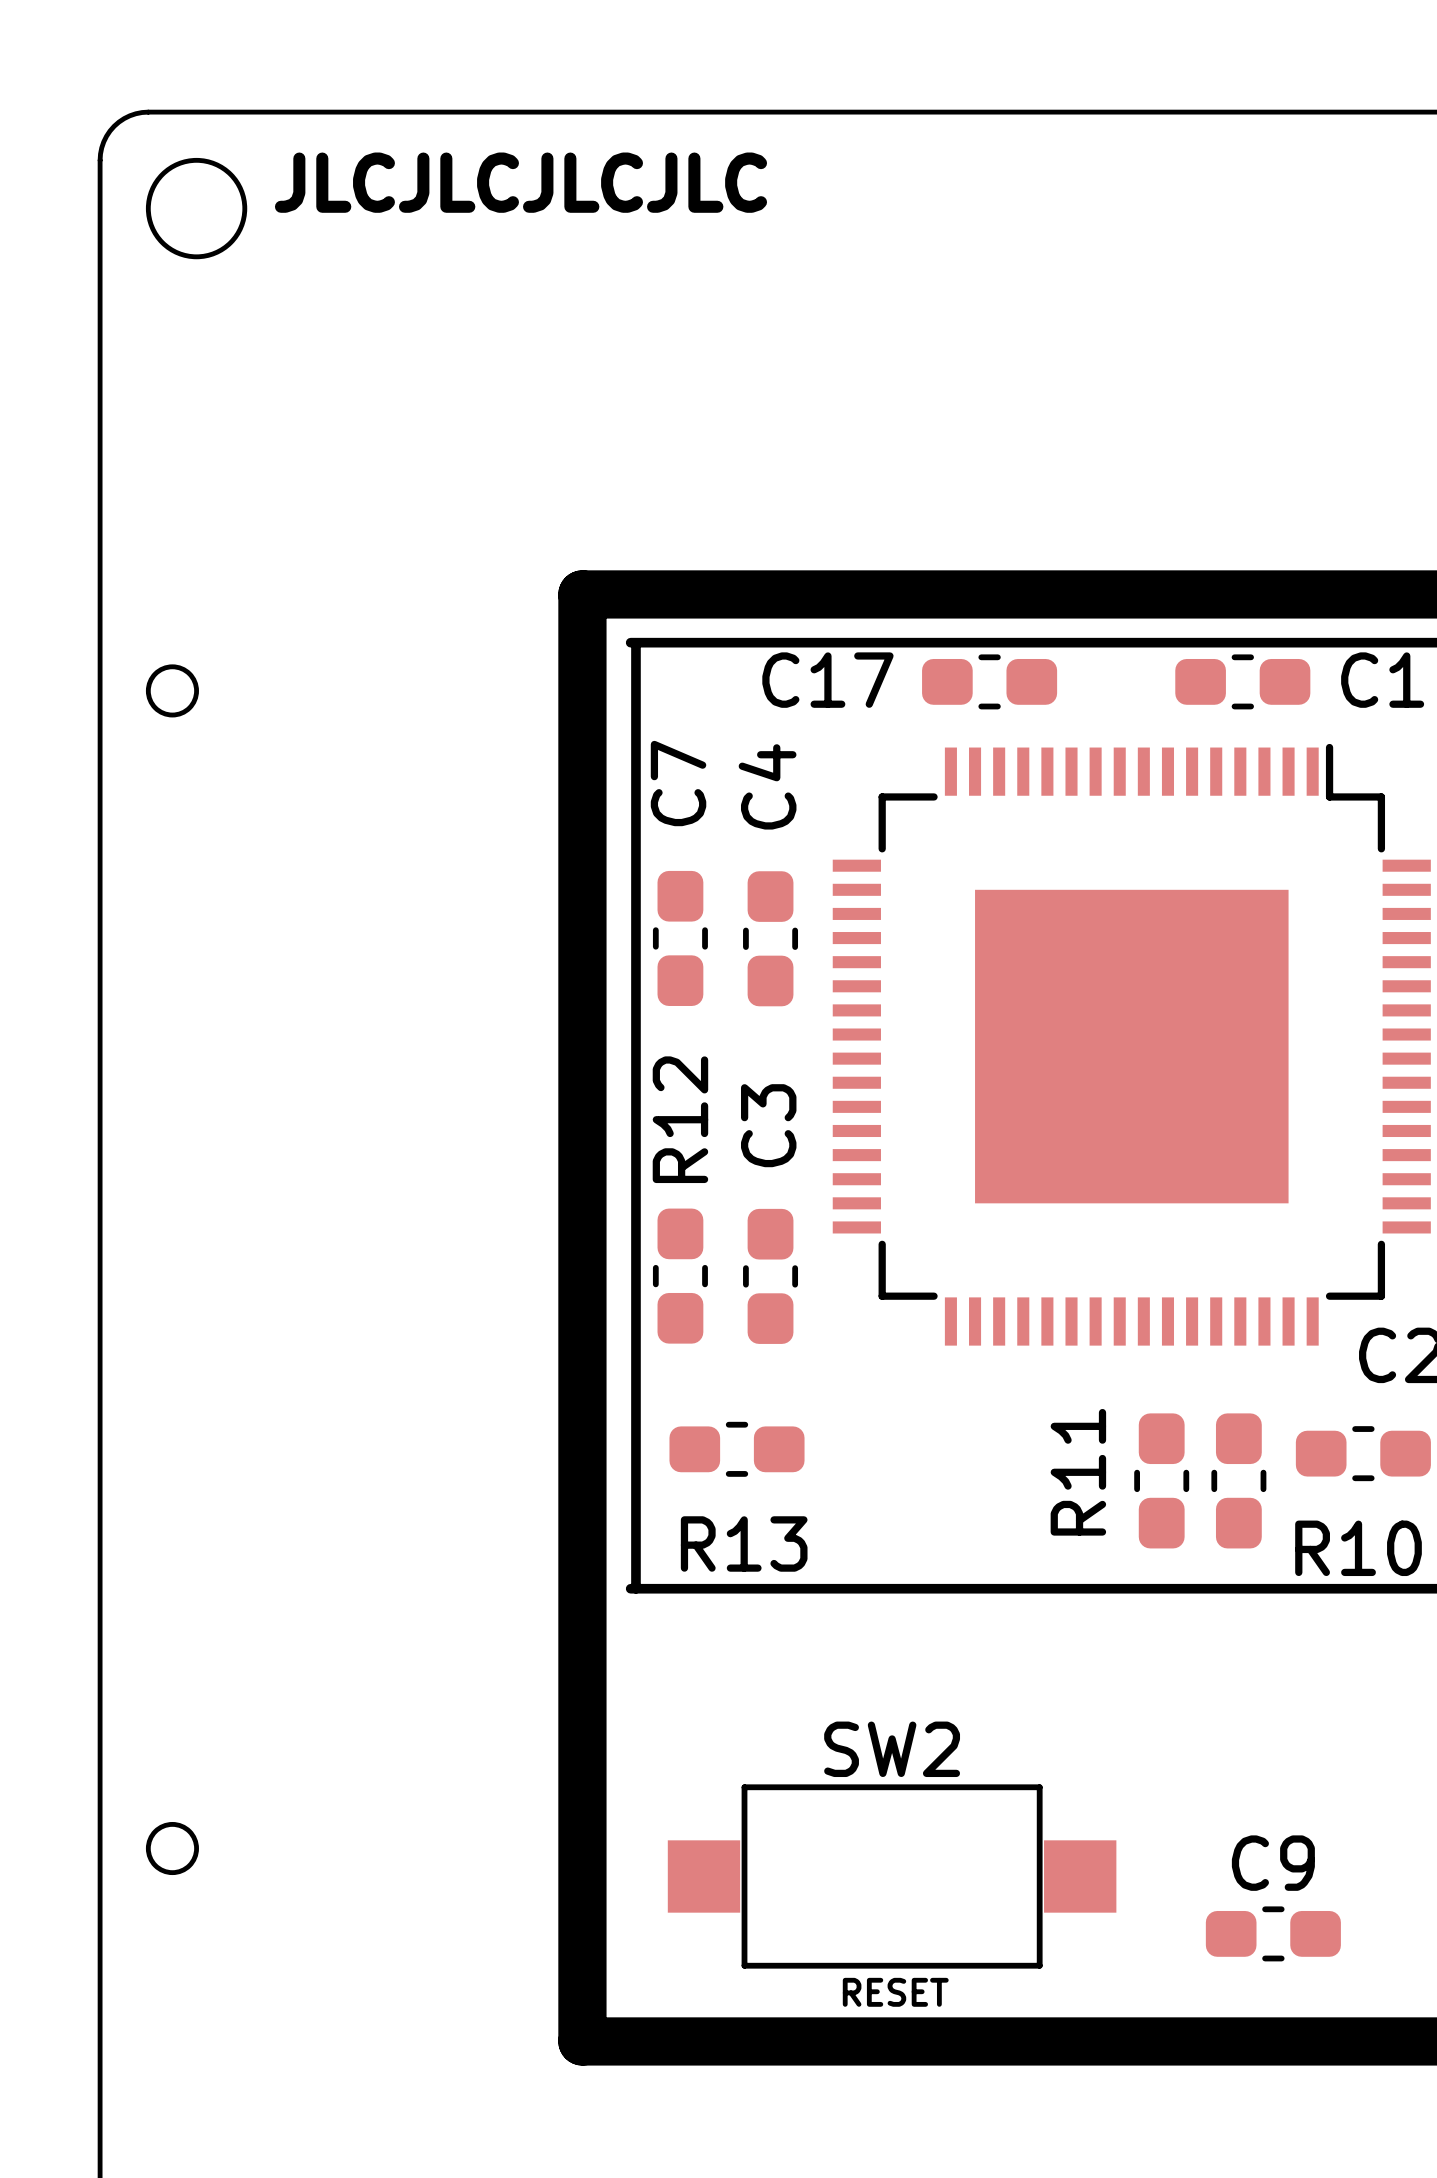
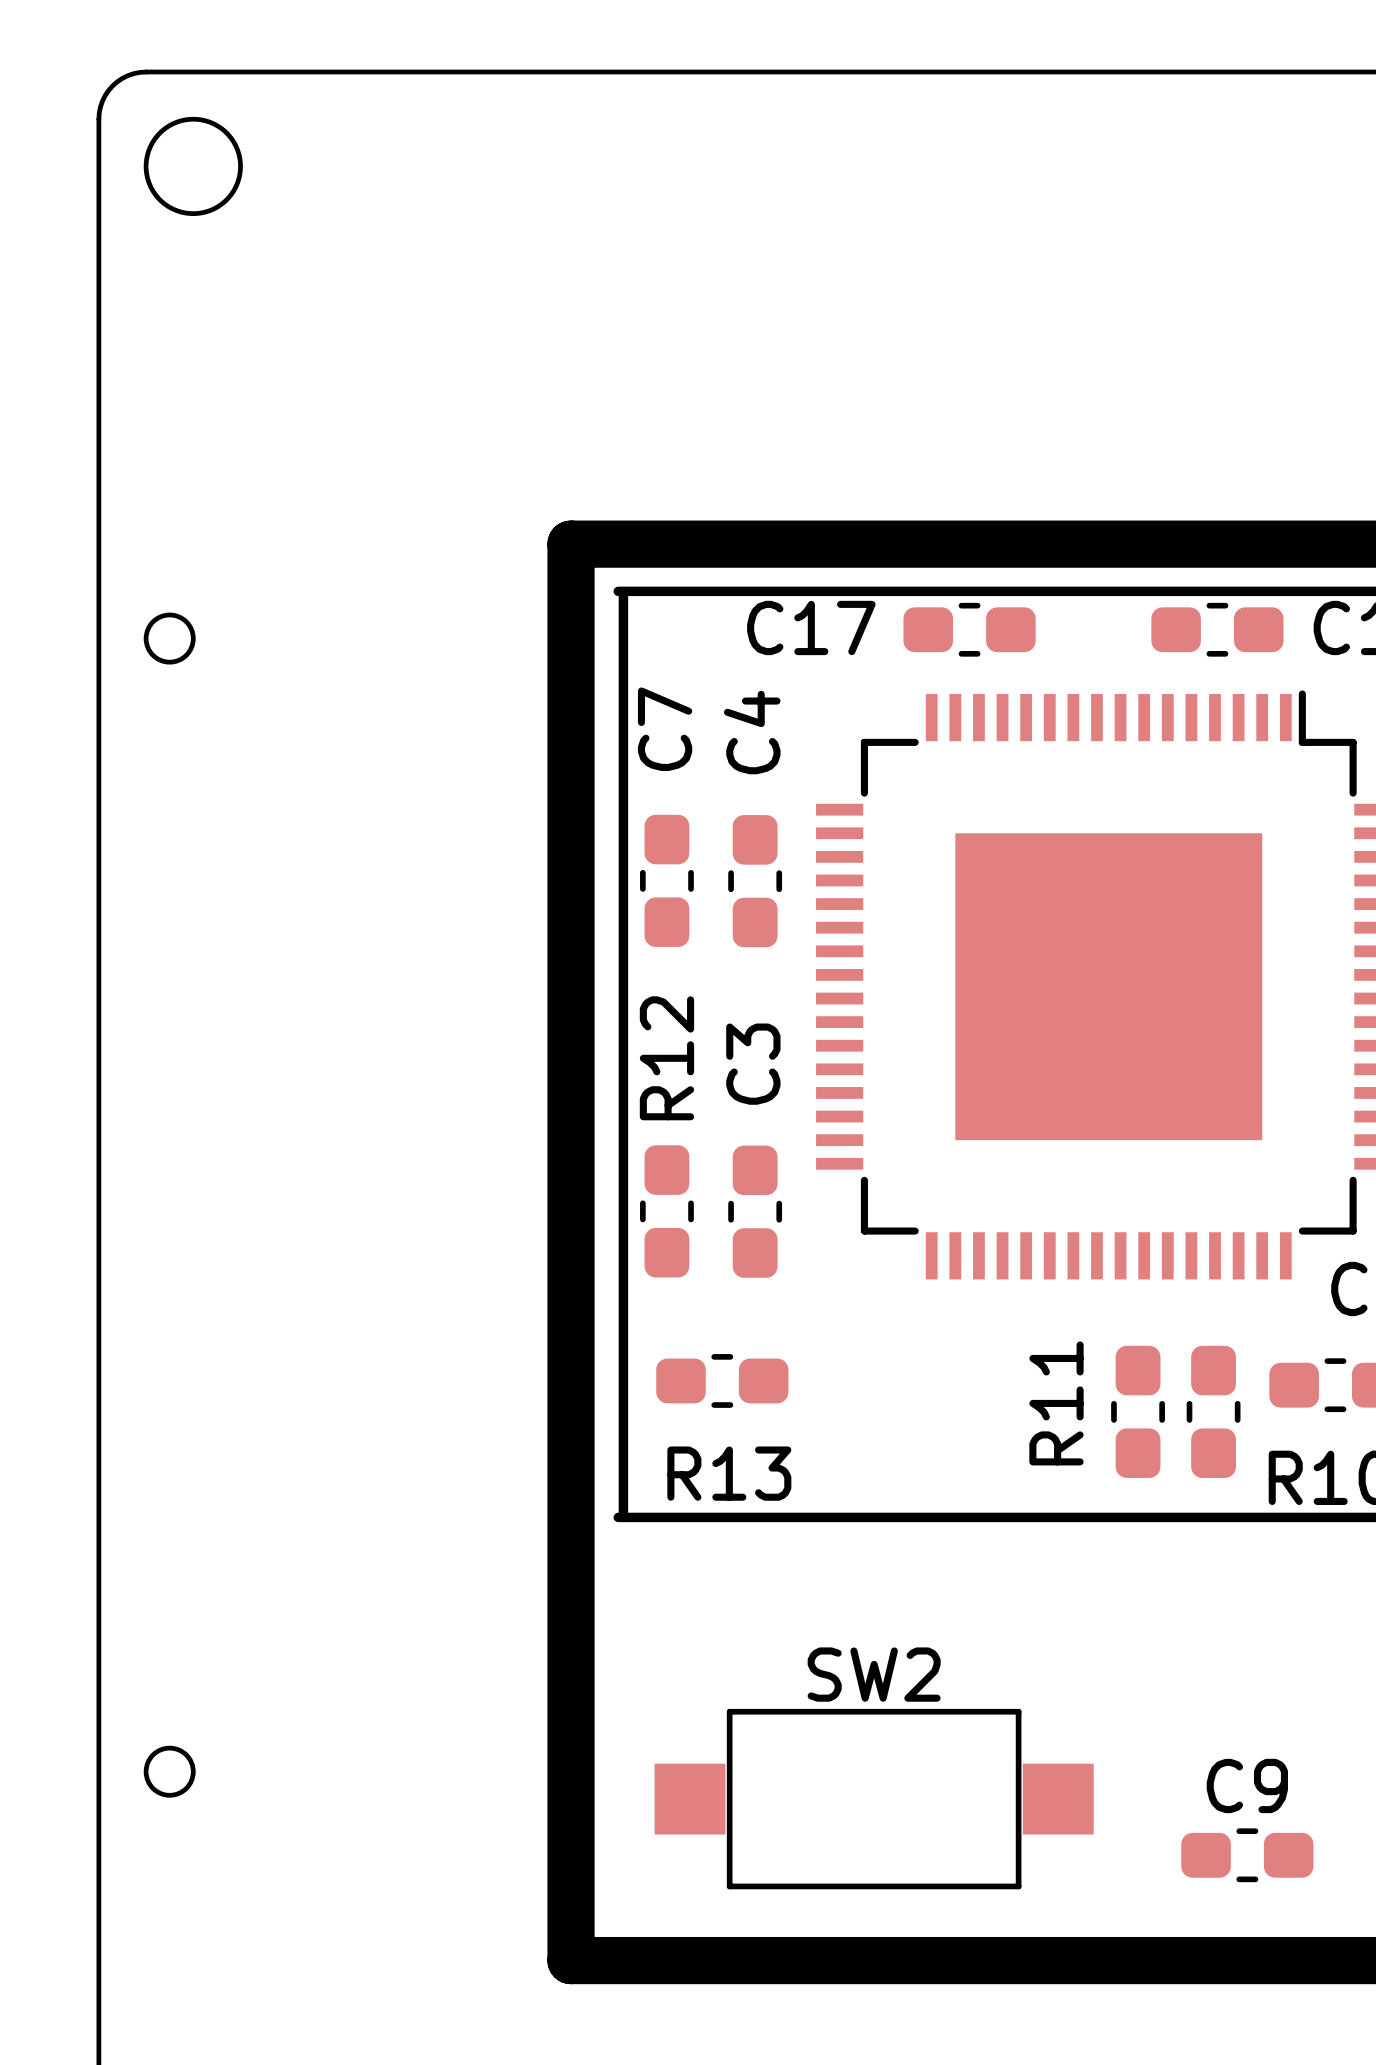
text: JLCJLCJLCJLC (520, 182) -> none
text: RESET (895, 1992) -> none

